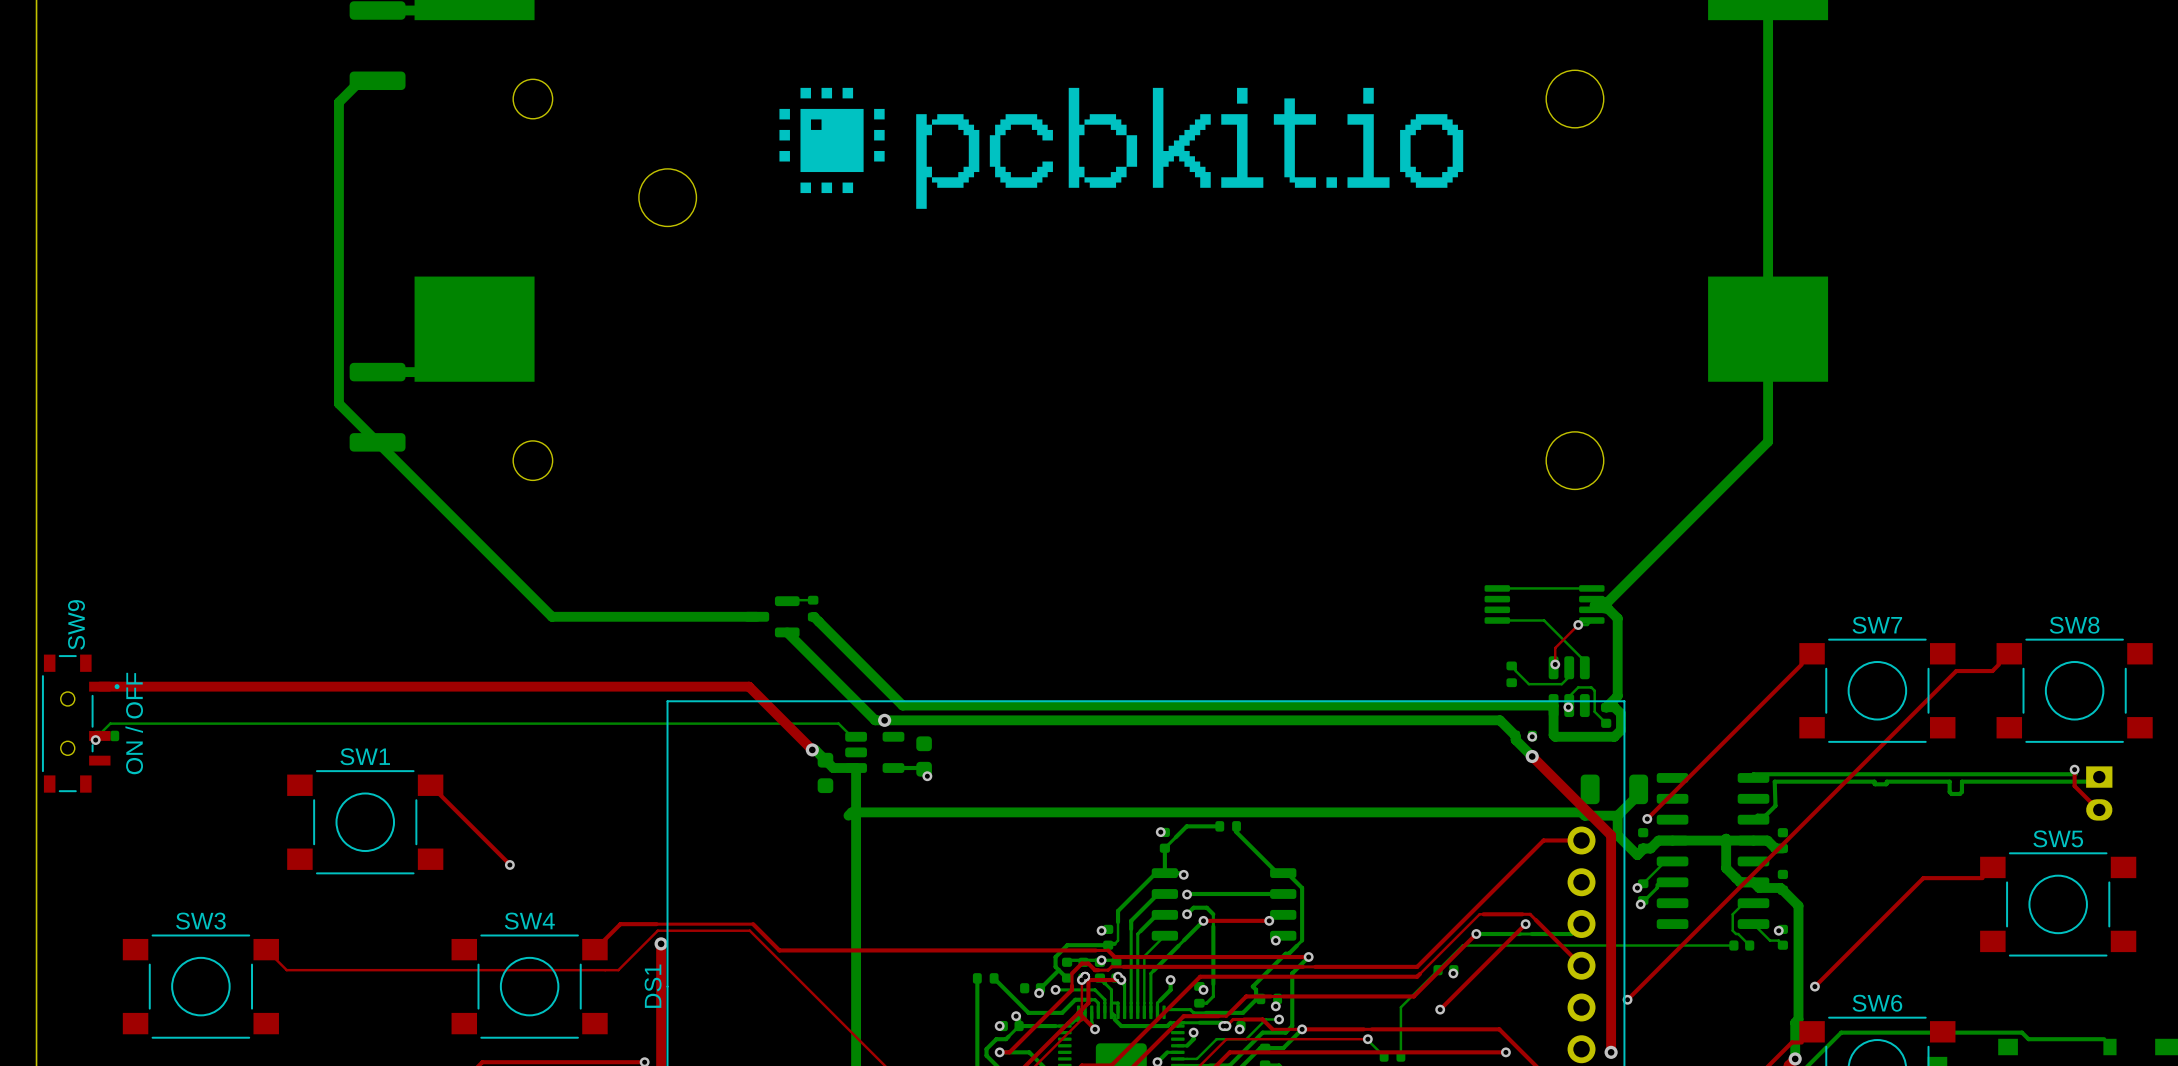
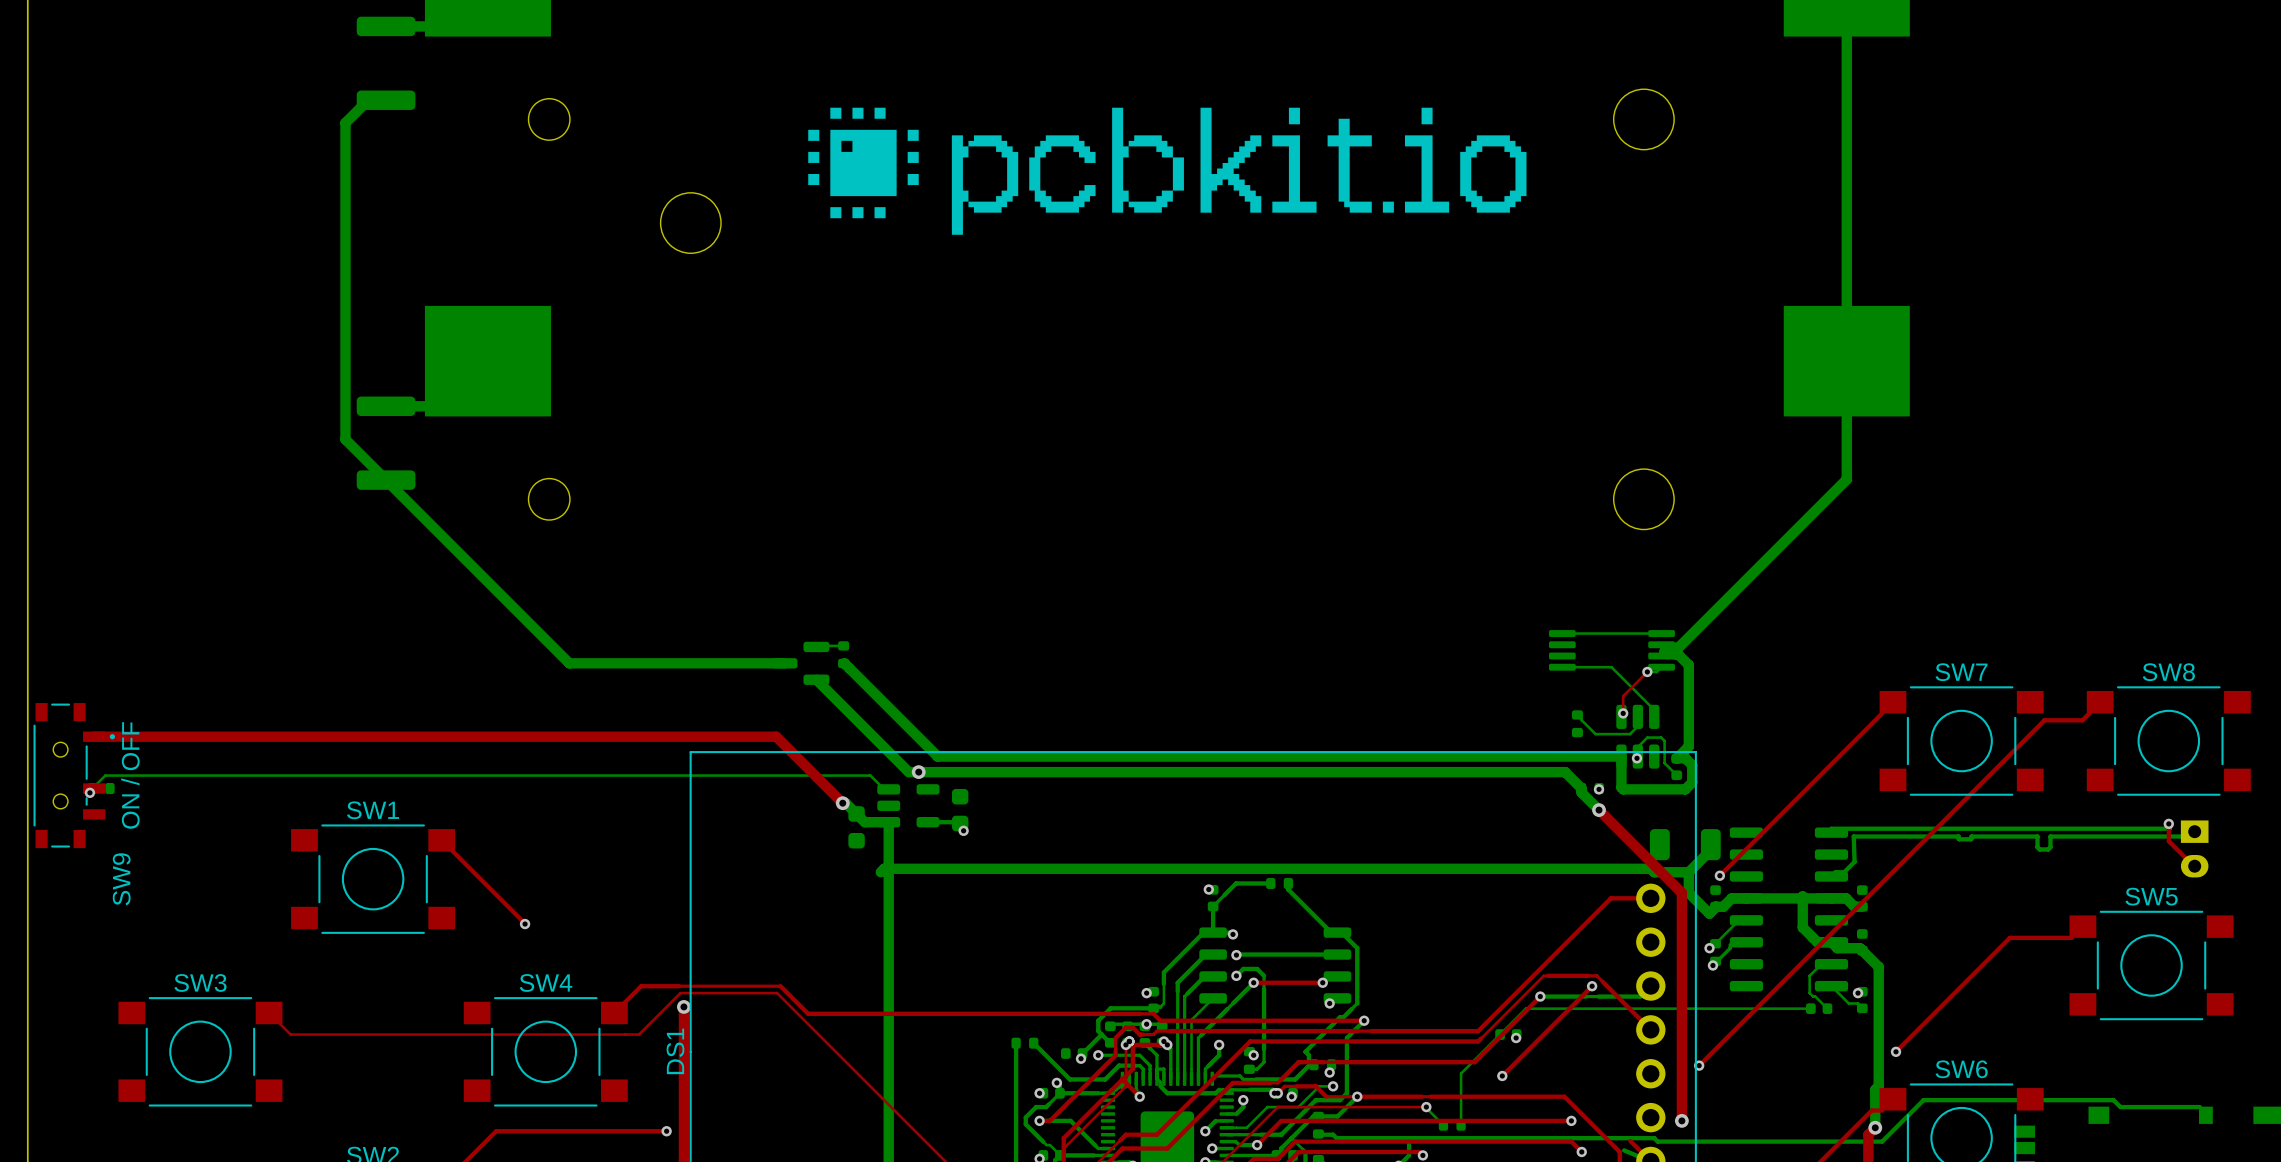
SW9 name position: SW9 (76, 624) -> SW9 (121, 879)

